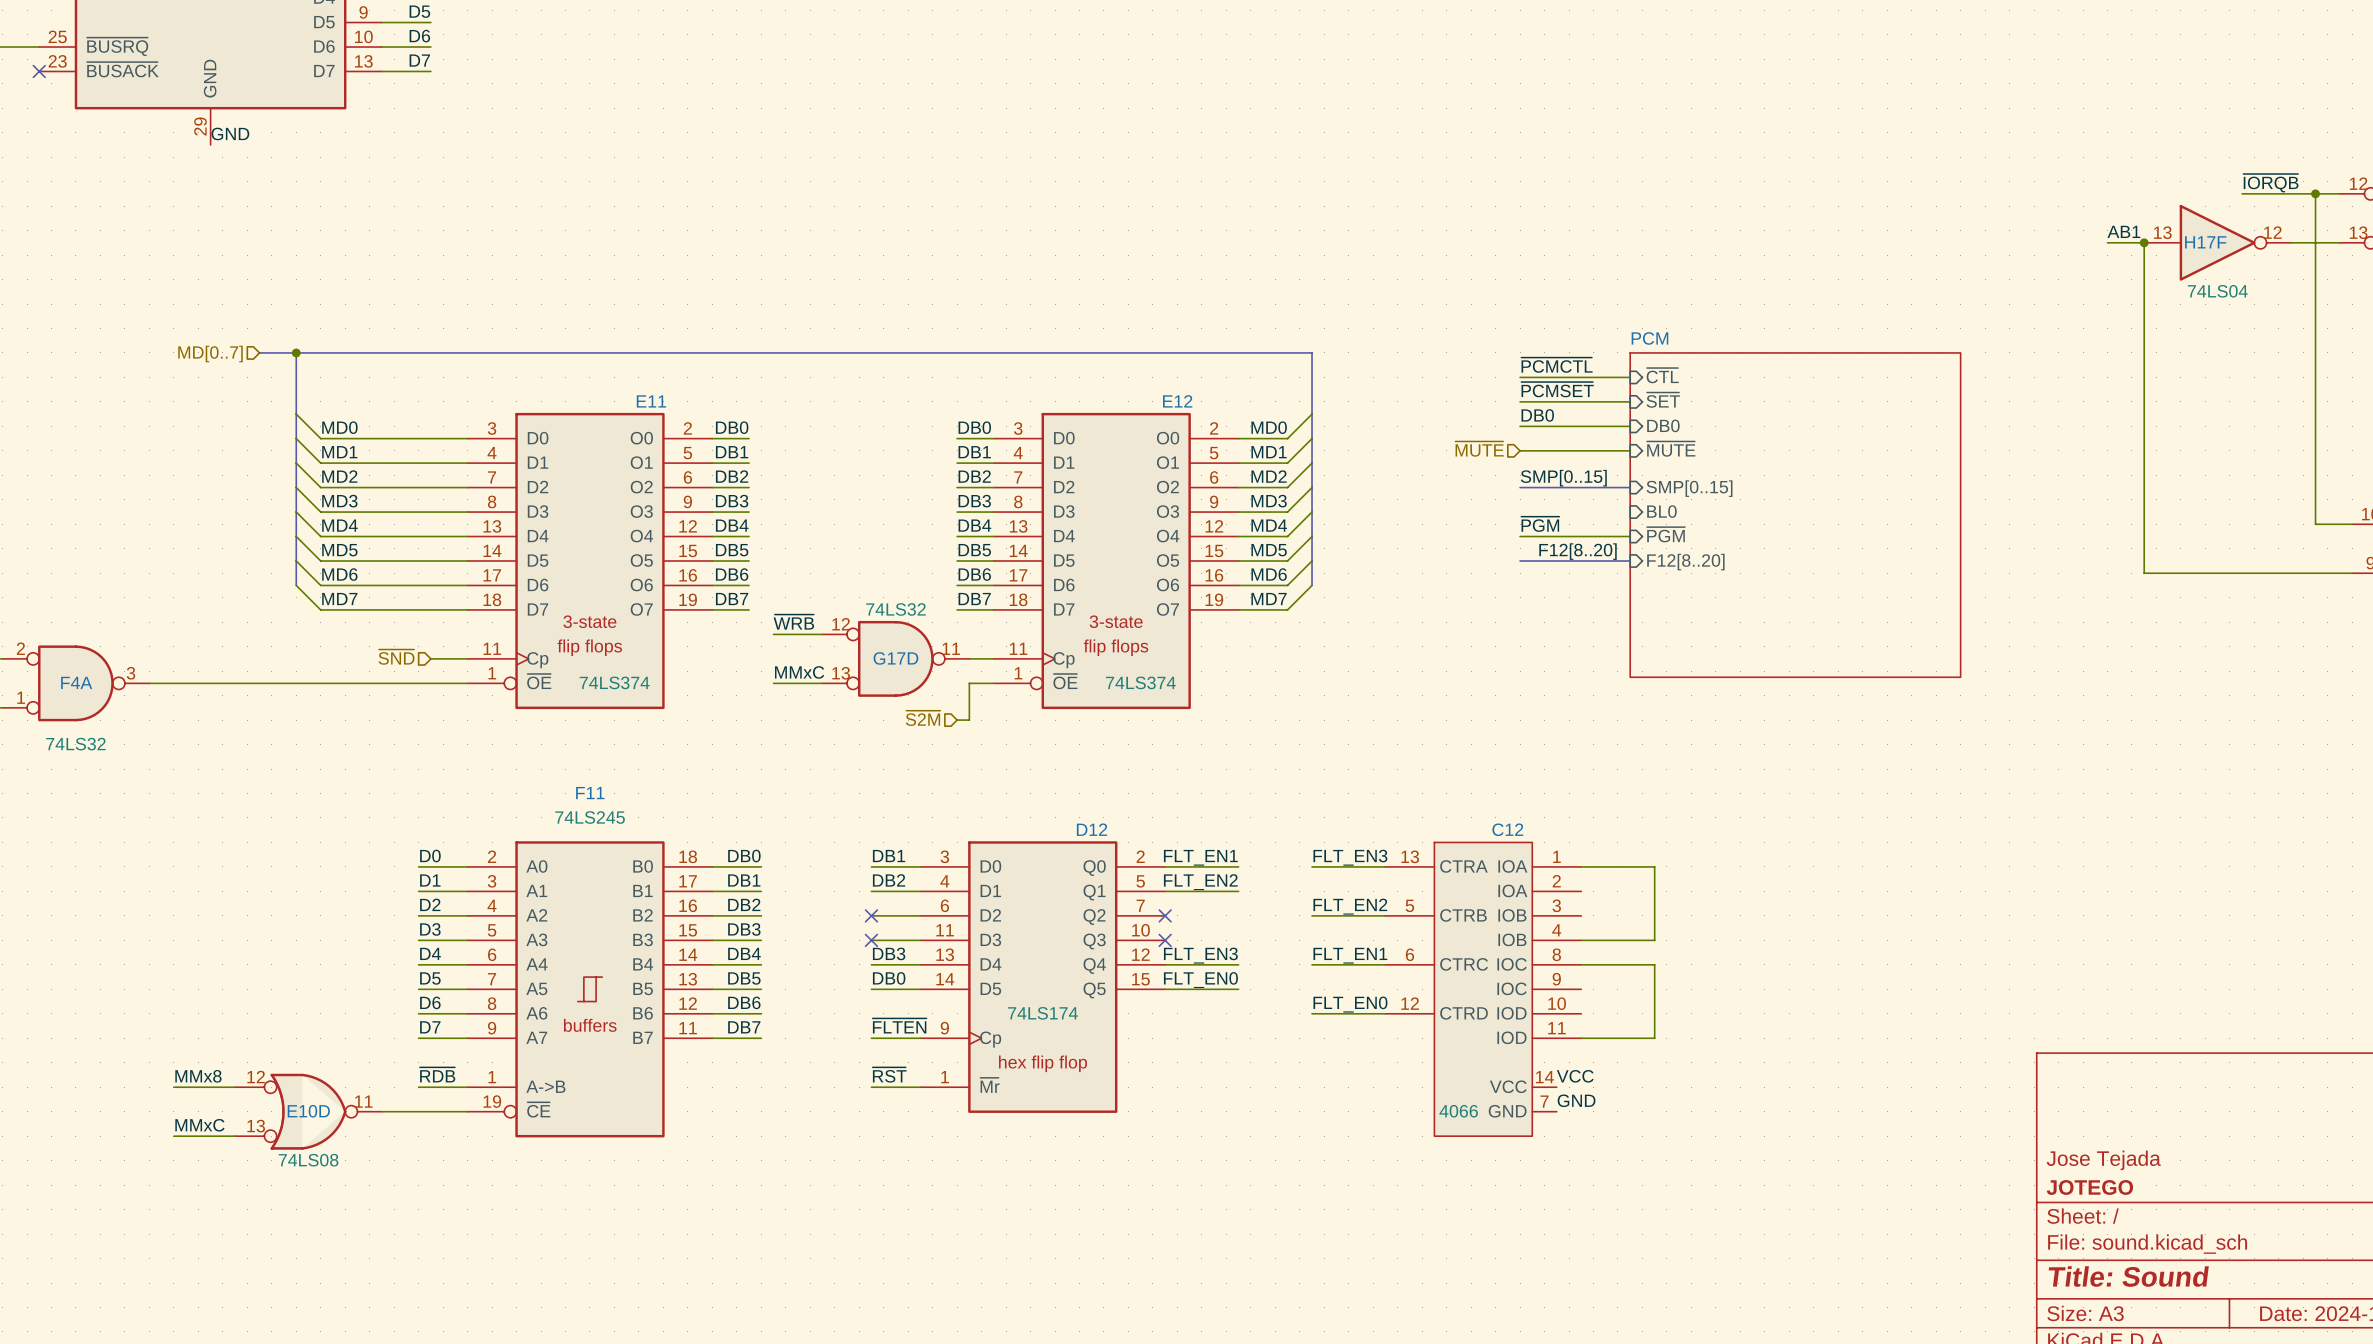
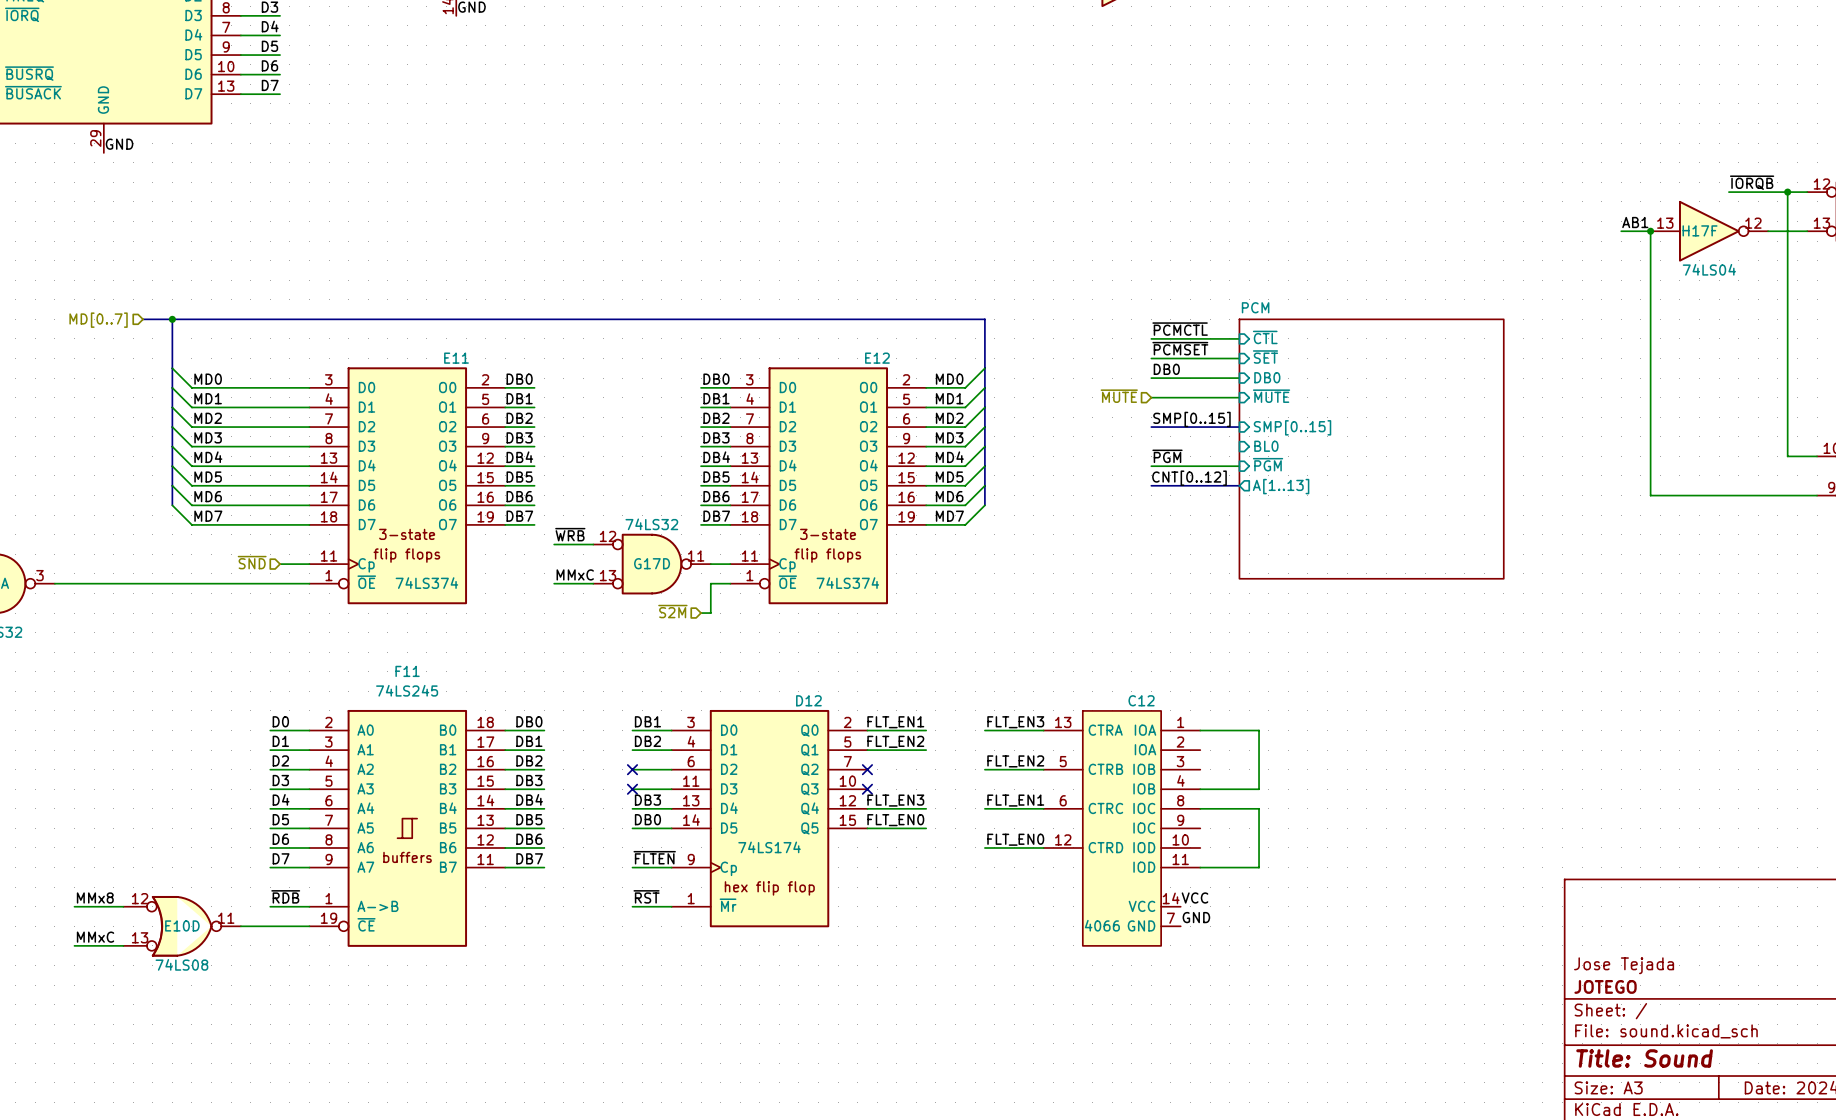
label: F12[8..20] (1578, 551) -> CNT[0..12] (1189, 478)
sheet pin shape: input (1685, 562) -> output (1281, 486)
sheet pin: F12[8..20] (1685, 562) -> A[1..13] (1281, 486)

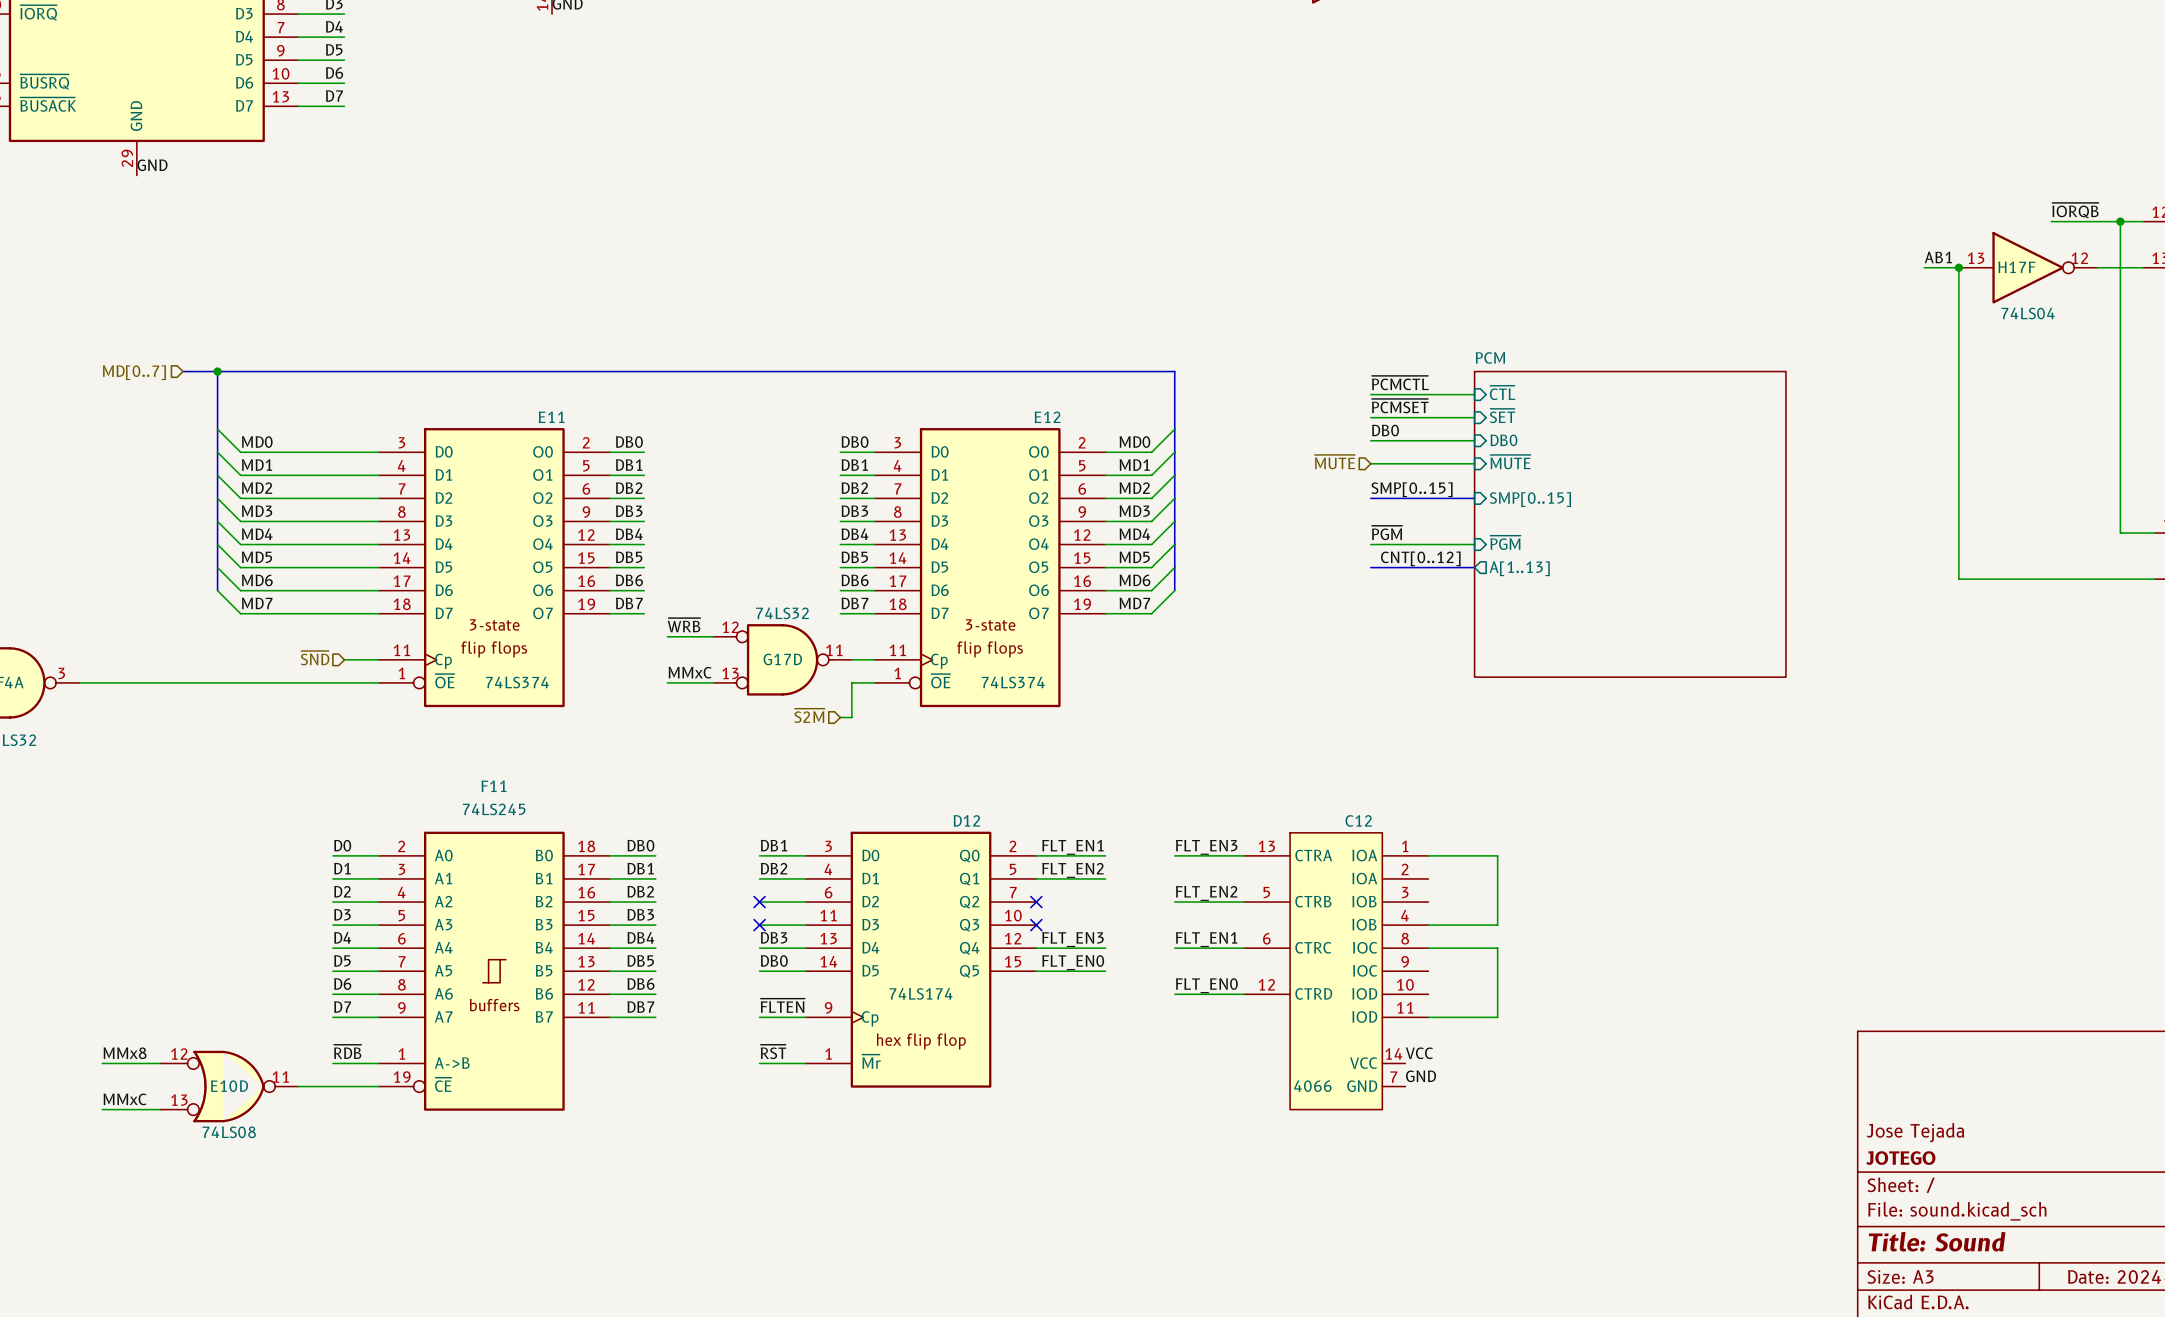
sheet pin: BL0 (1266, 446) -> none

